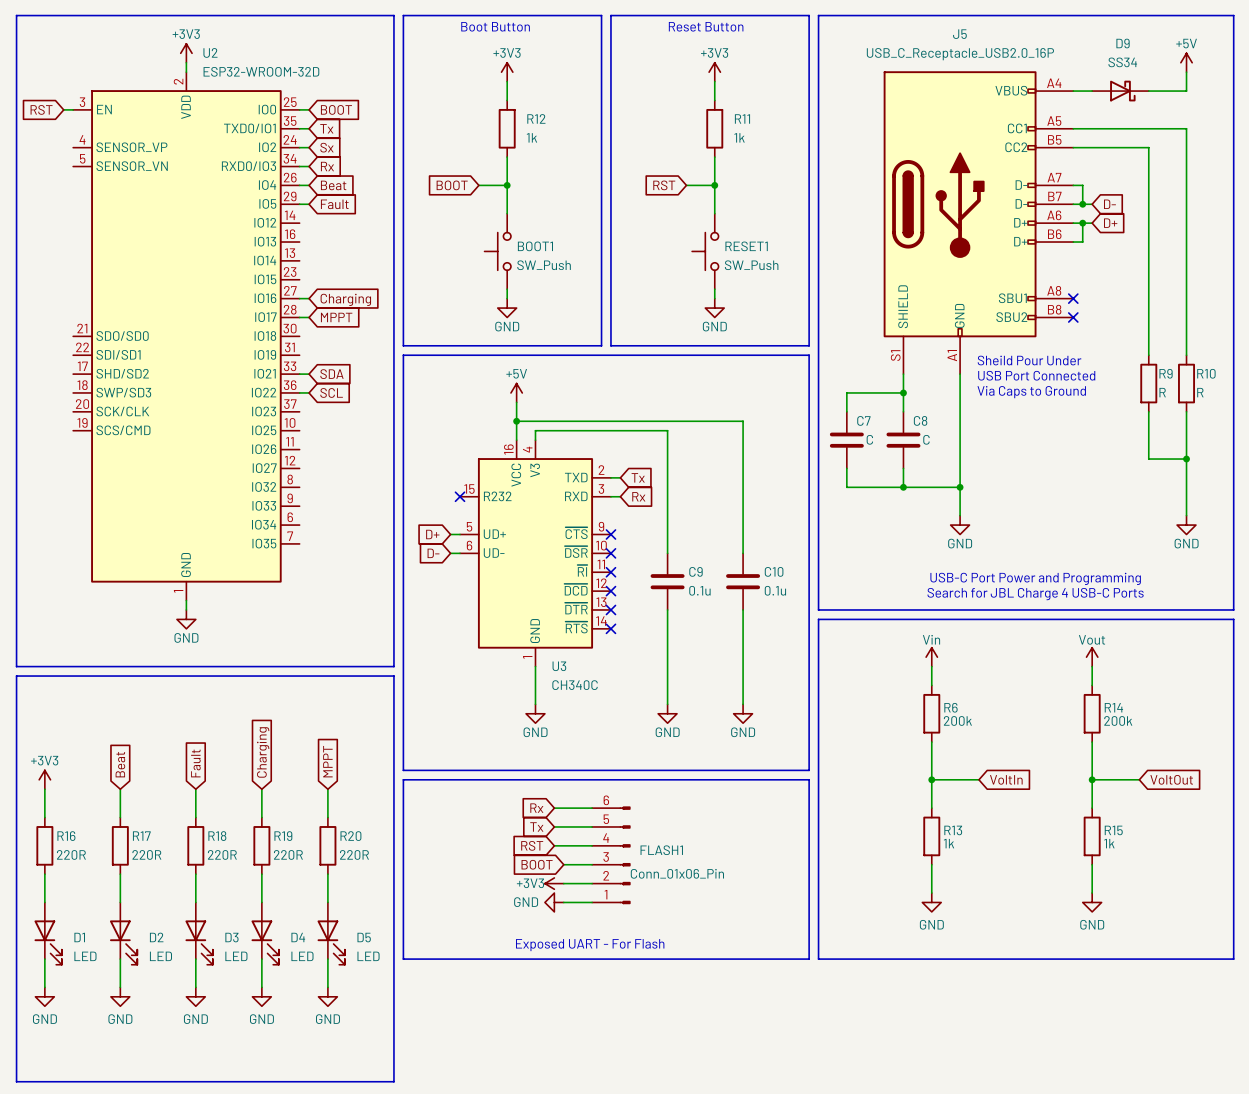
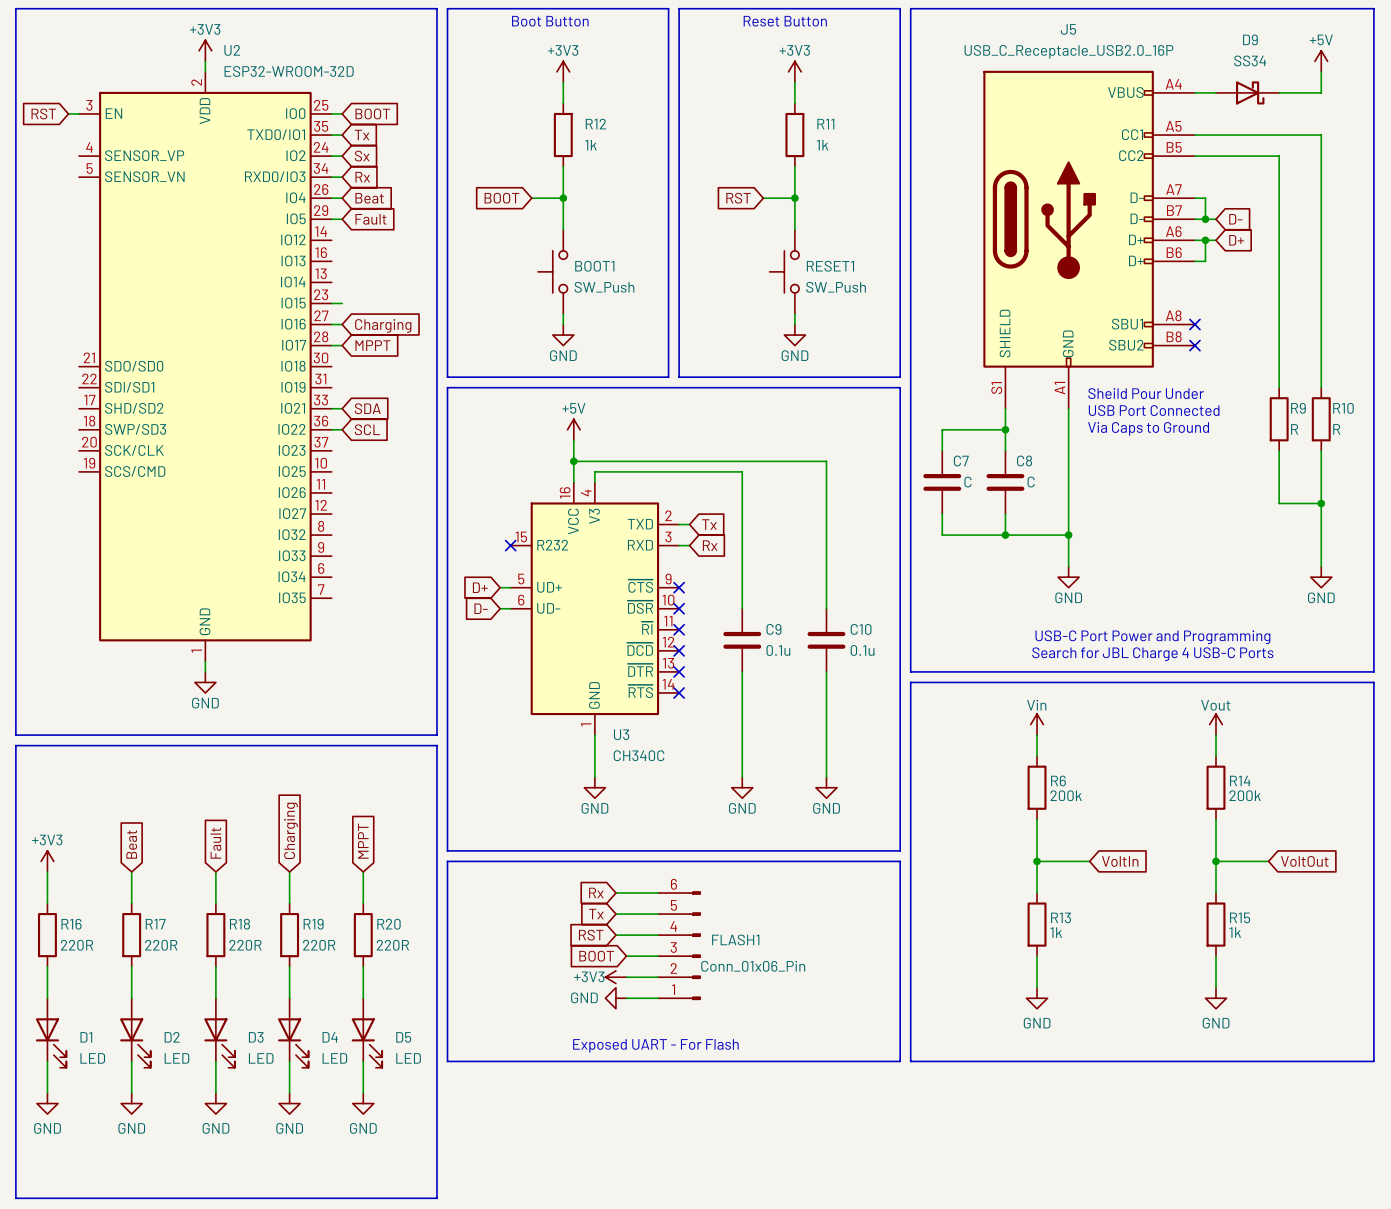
wire: none -> (331, 303) (342, 303)

